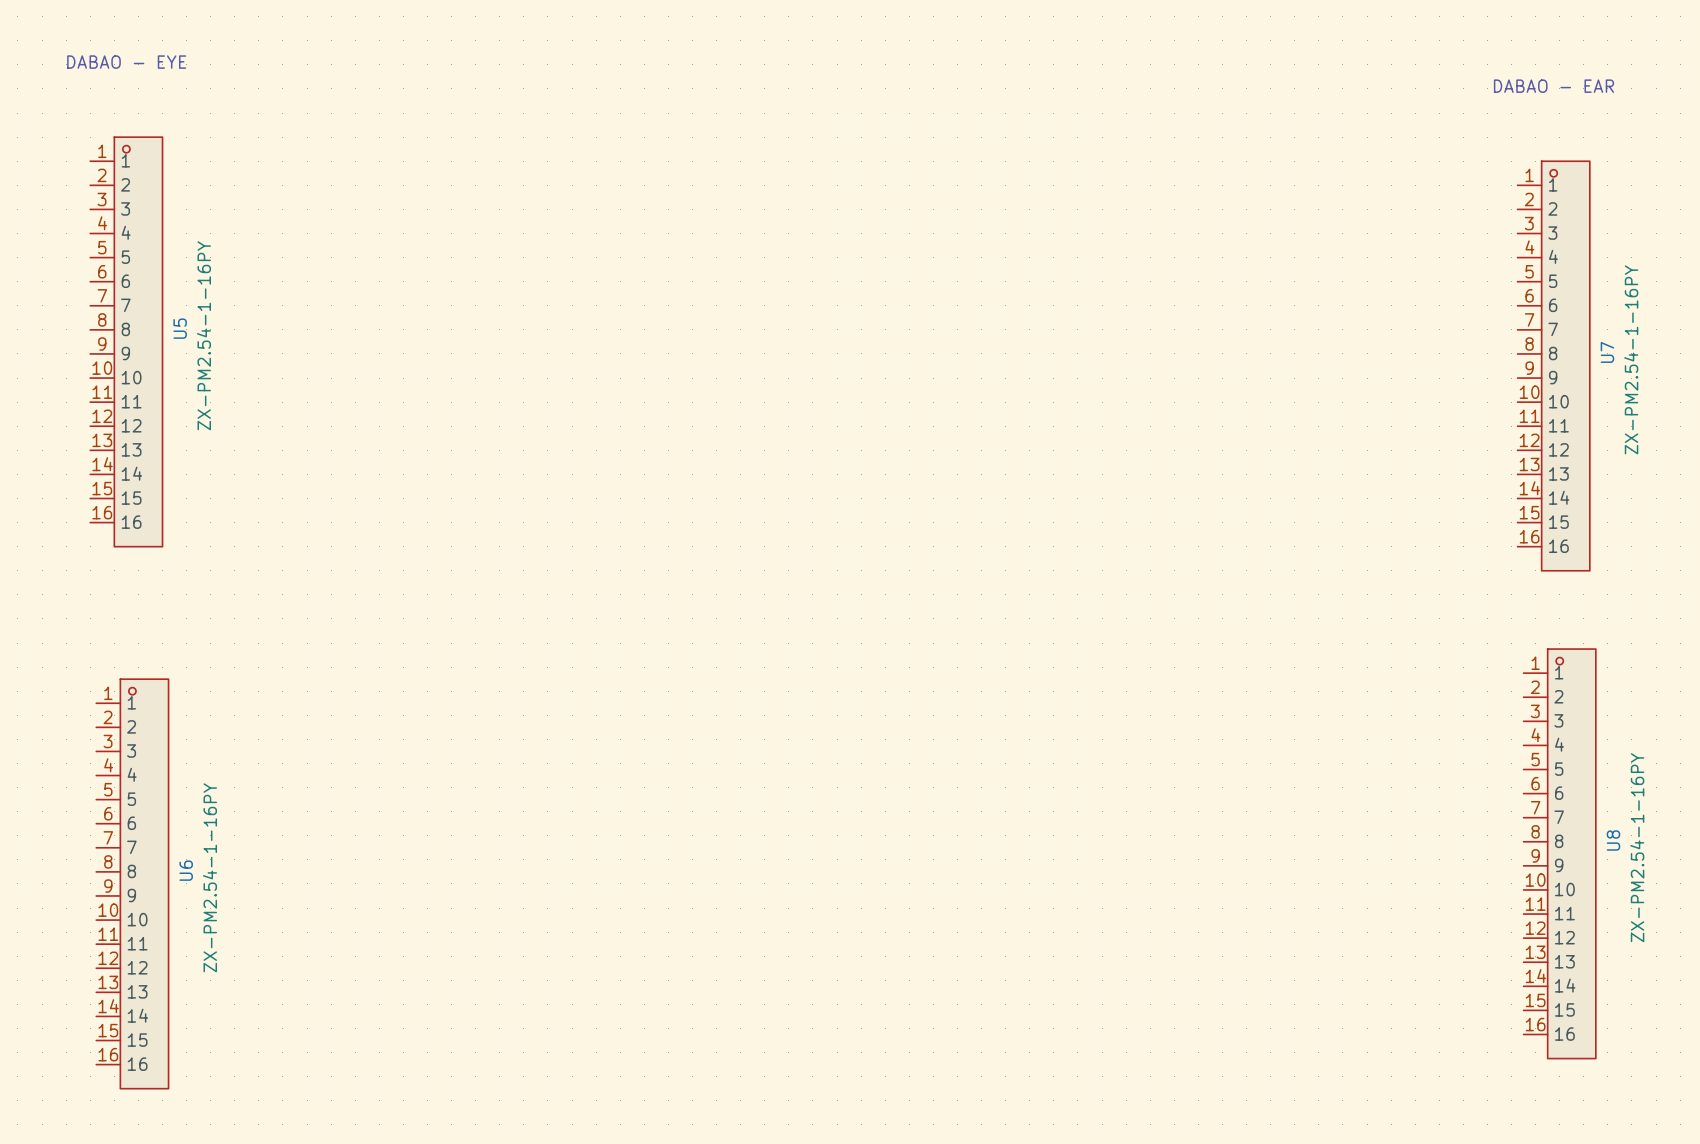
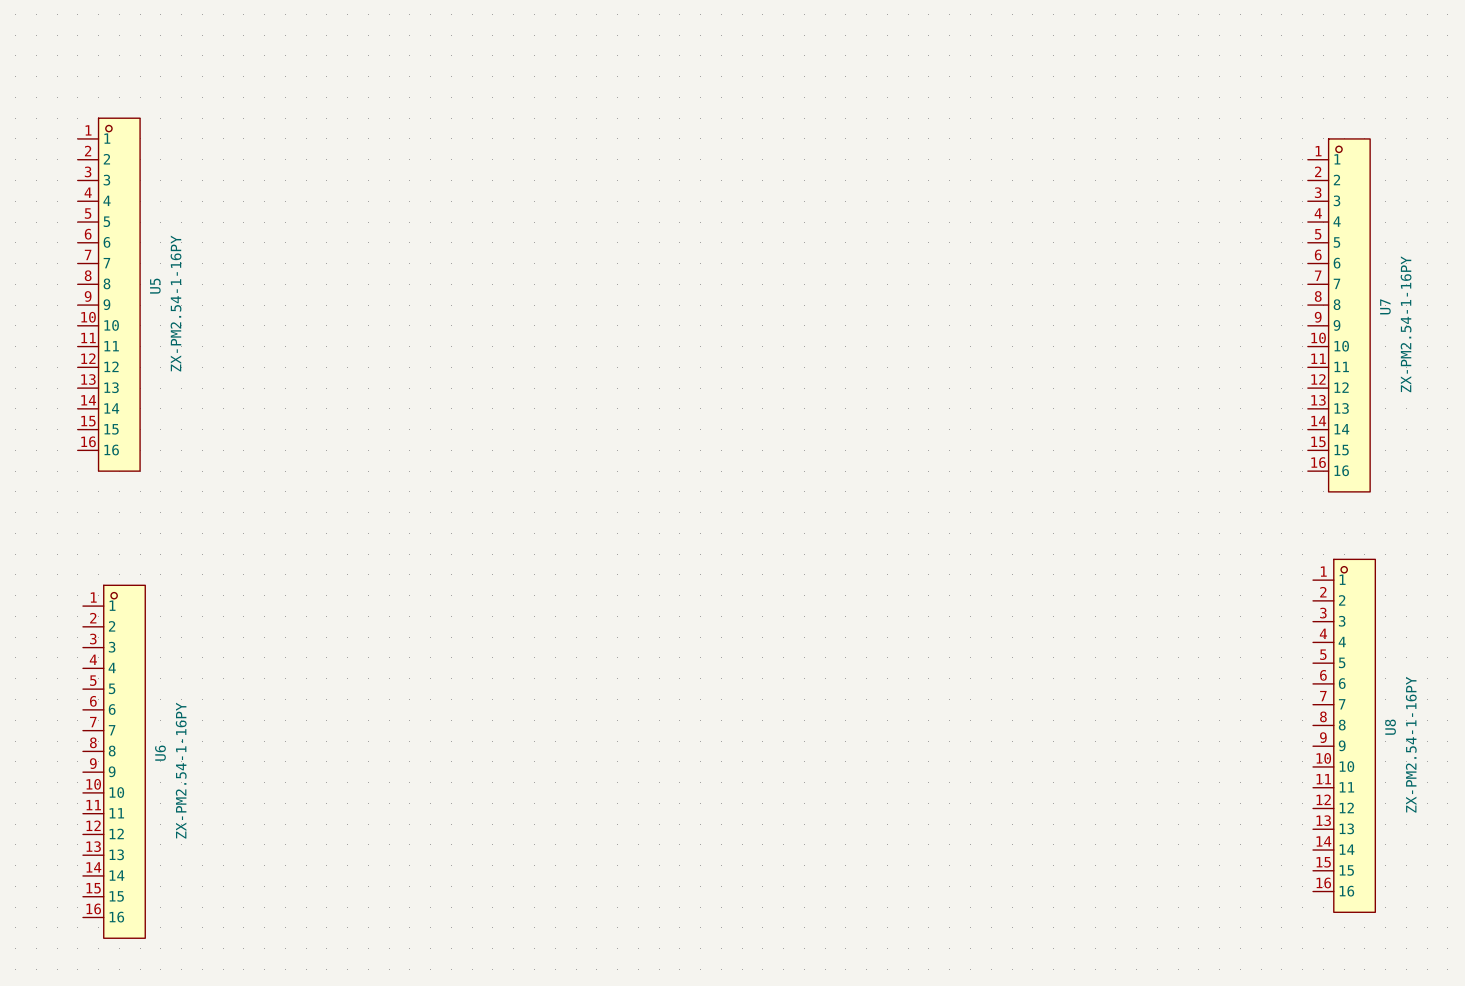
text: DABAO - EYE (126, 62) -> none
text: DABAO - EAR (1553, 86) -> none

